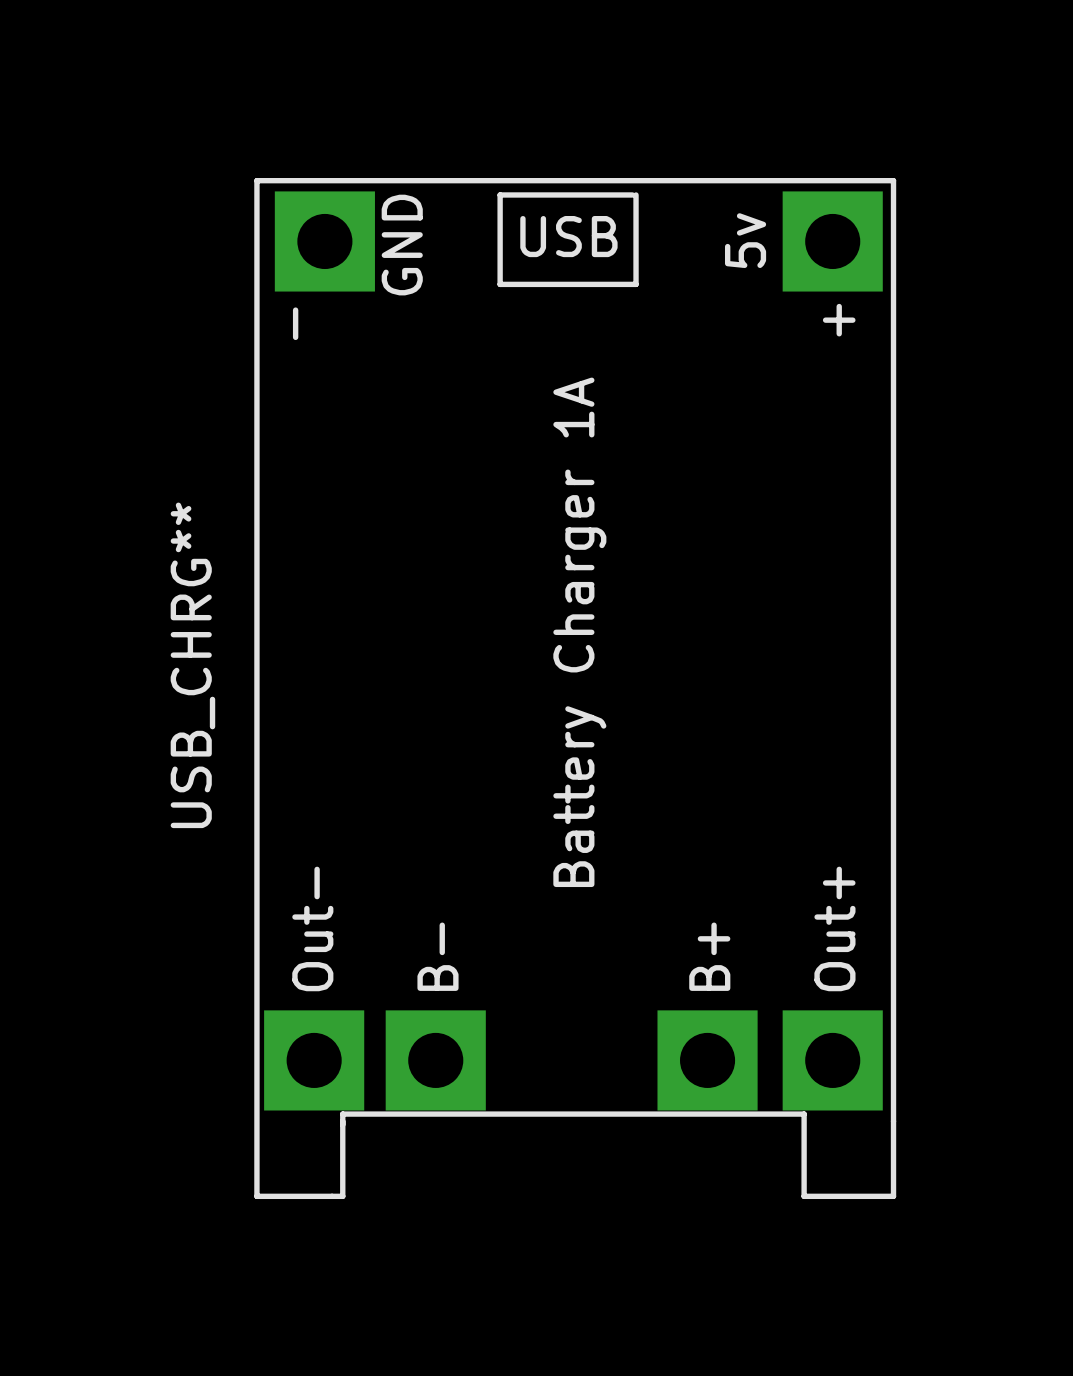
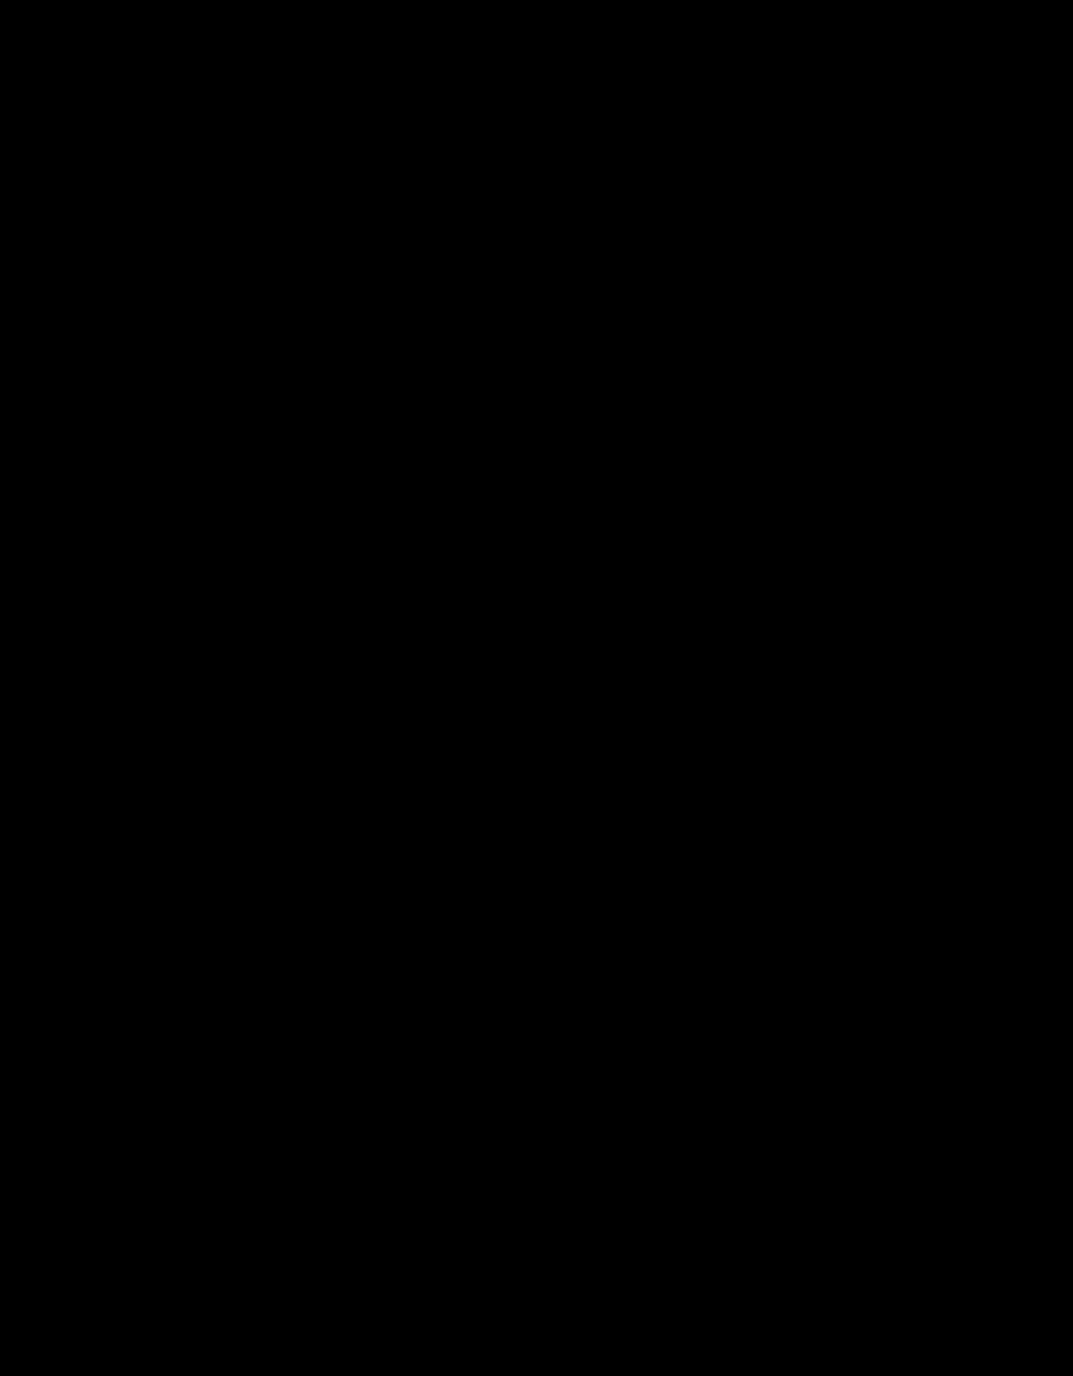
USB_CHRG**: (575, 688) -> none

